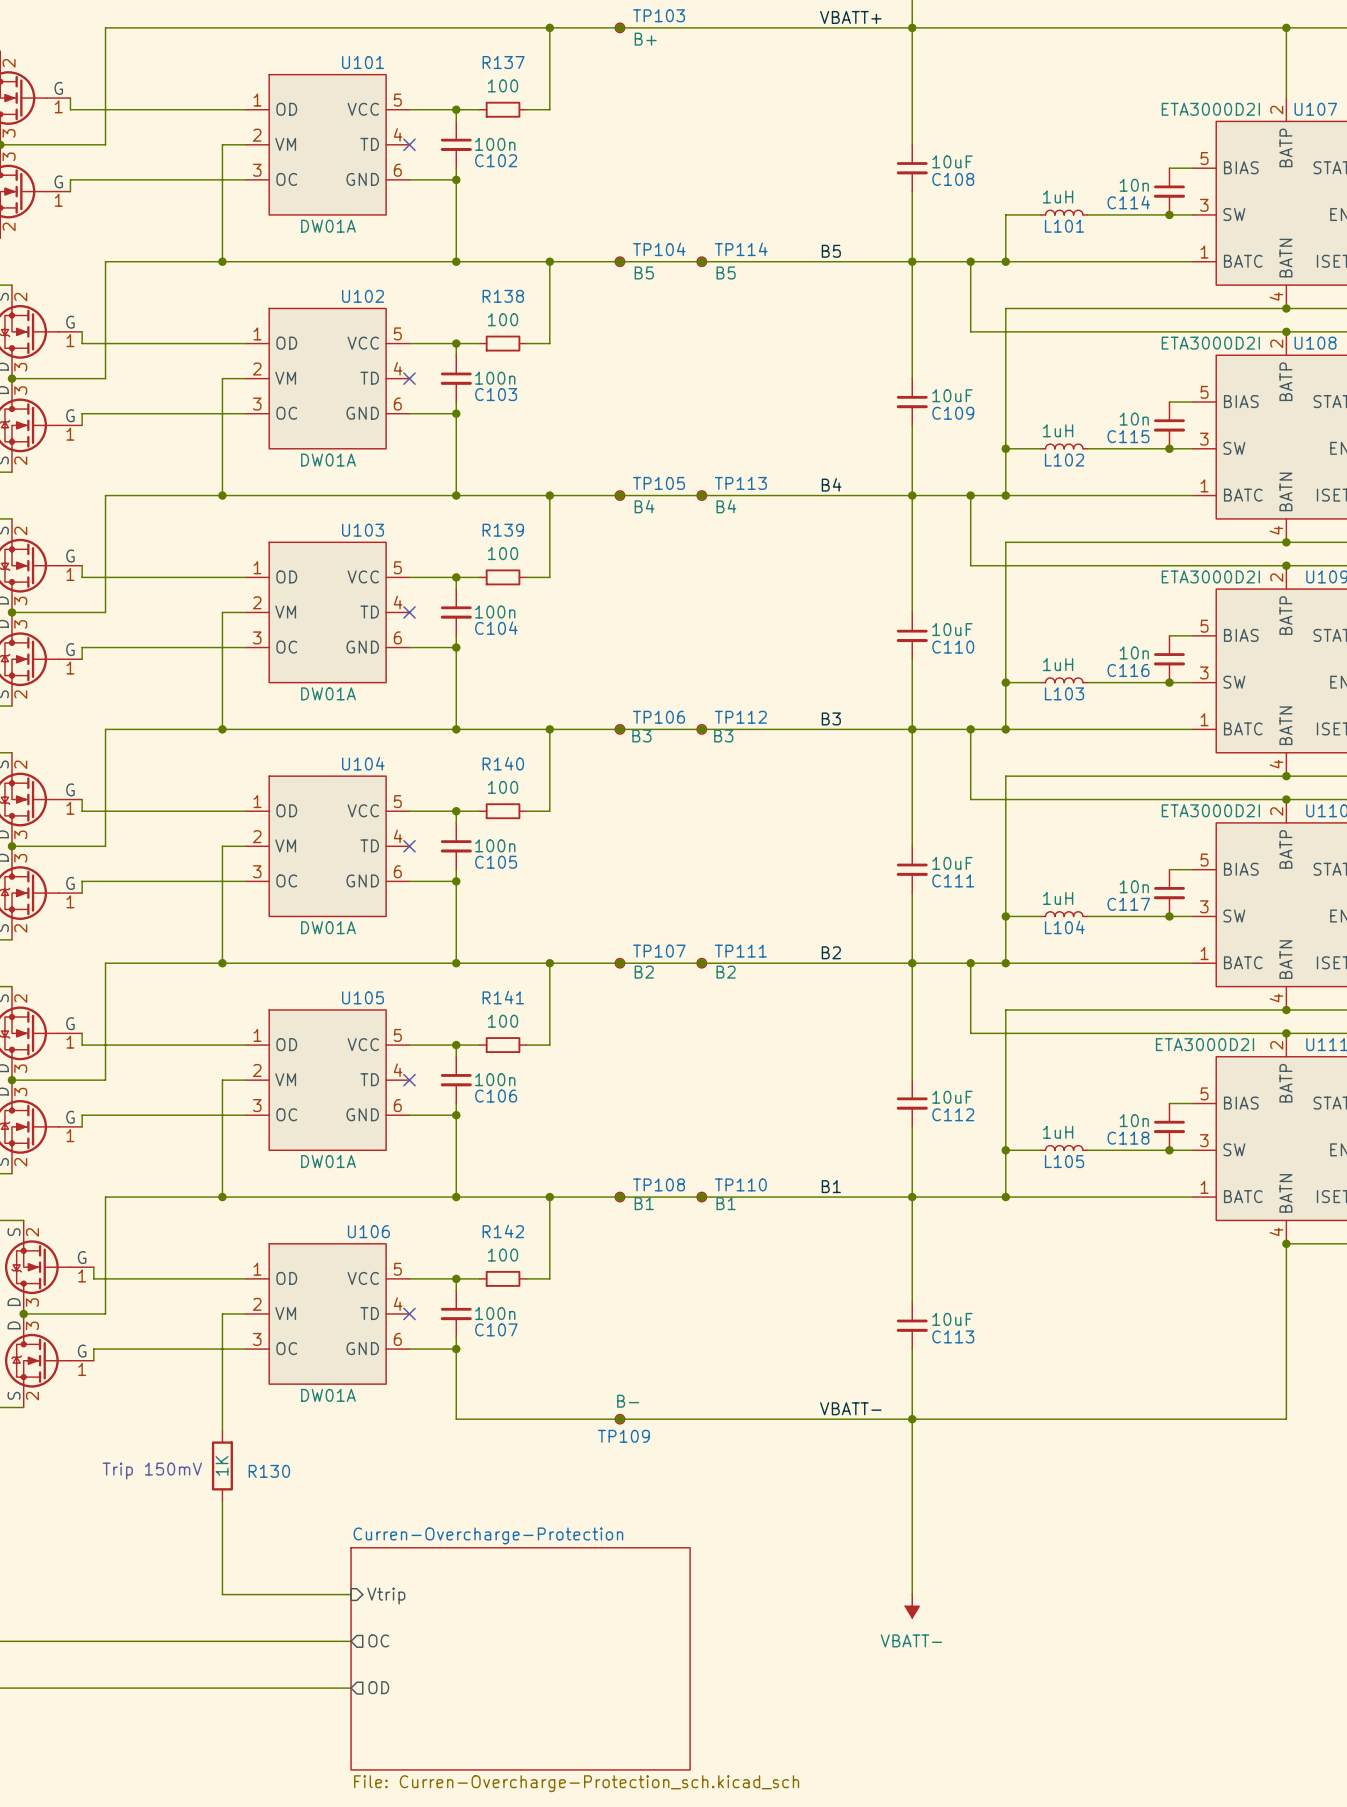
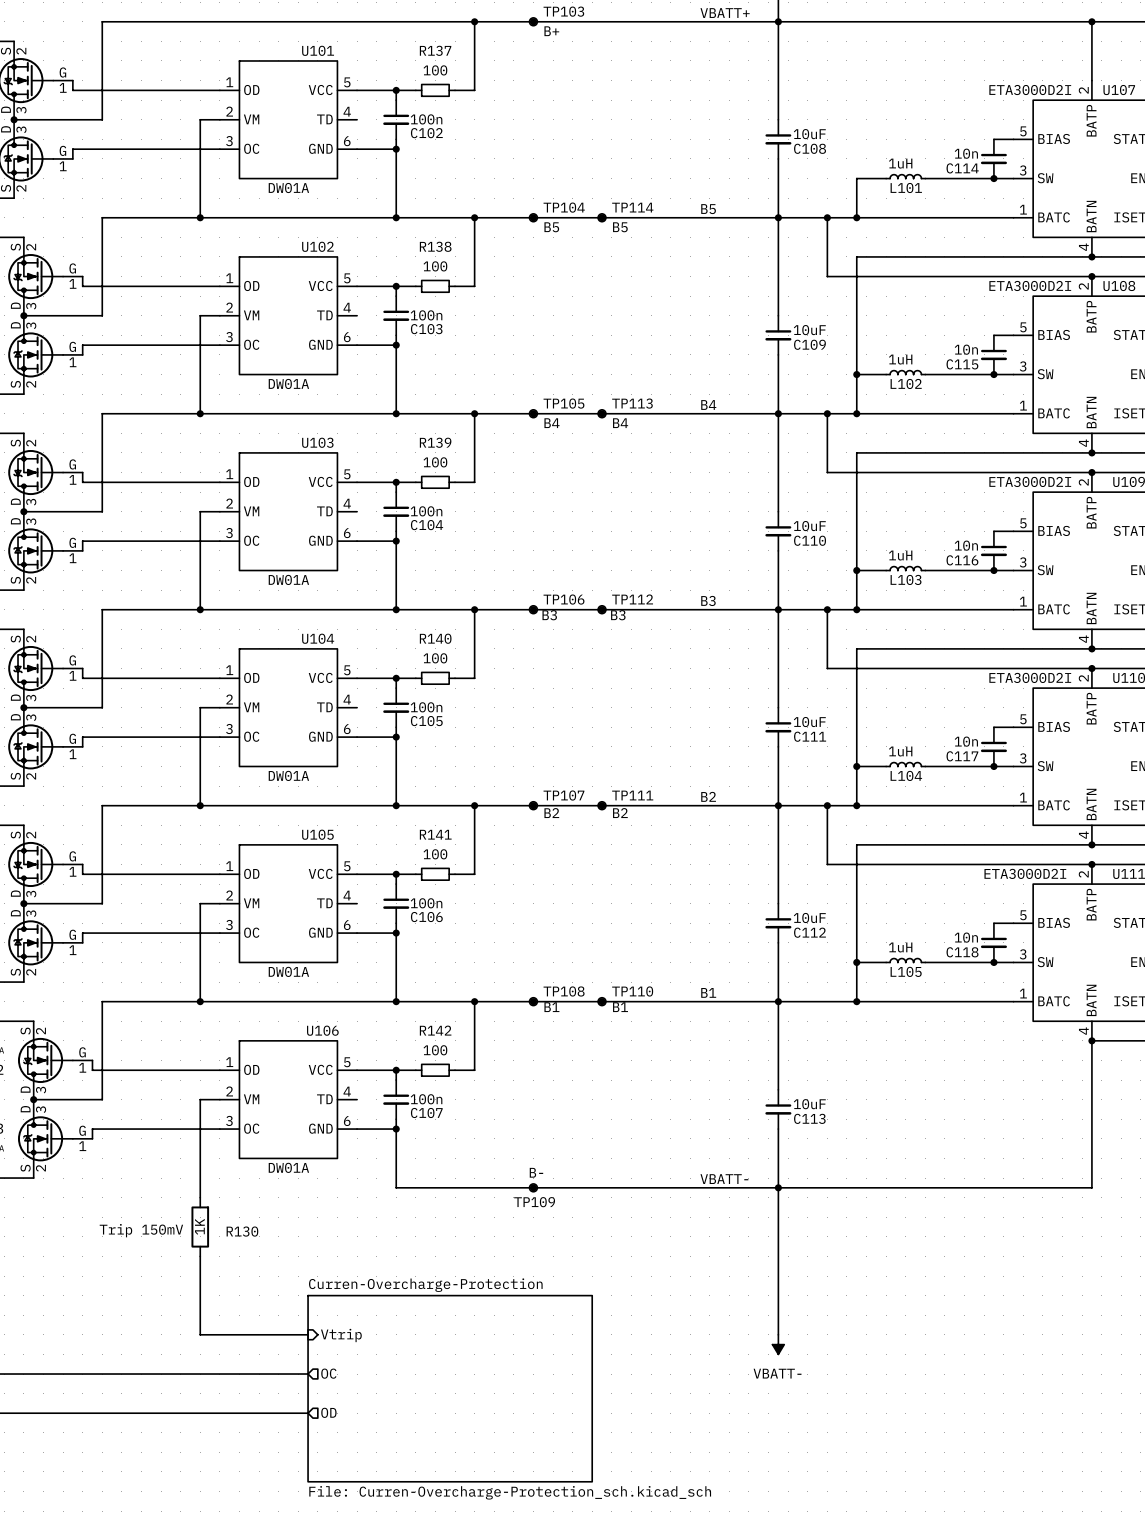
no-connect mark: (409, 144) -> none
no-connect mark: (409, 378) -> none
no-connect mark: (409, 612) -> none
no-connect mark: (409, 846) -> none
no-connect mark: (409, 1080) -> none
no-connect mark: (409, 1313) -> none

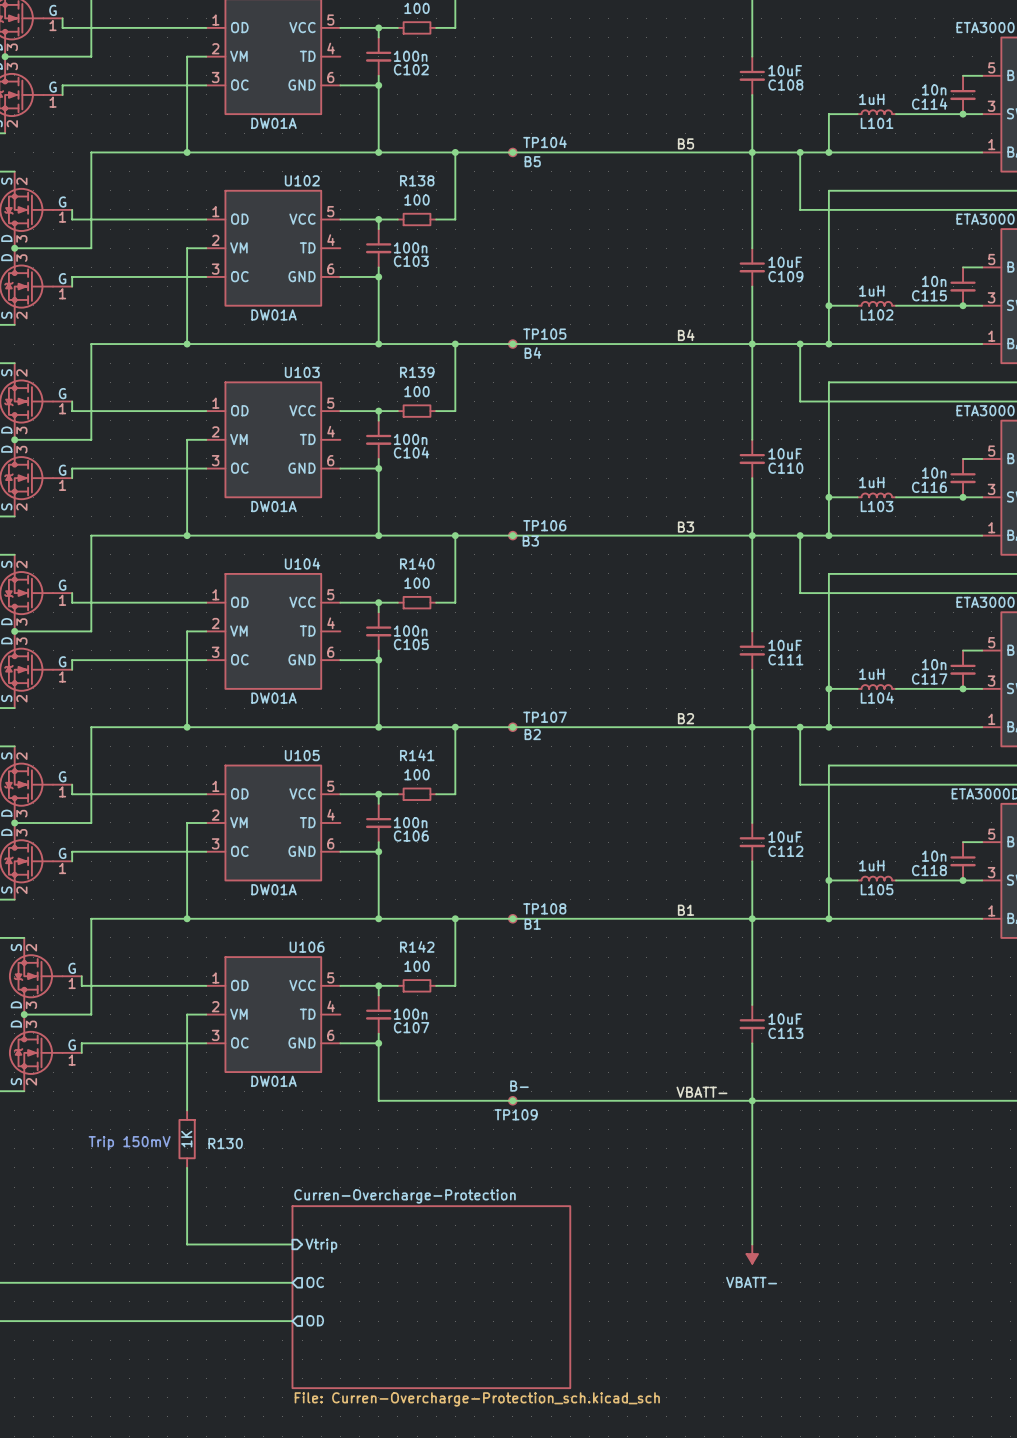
junction: (602, 217) -> none
TP114: B5 (602, 217) -> none
junction: (602, 413) -> none
TP113: B4 (602, 413) -> none
junction: (602, 609) -> none
TP112: B3 (602, 609) -> none
junction: (602, 805) -> none
TP111: B2 (602, 805) -> none
junction: (602, 1001) -> none
TP110: B1 (602, 1001) -> none

